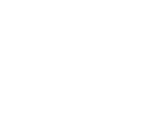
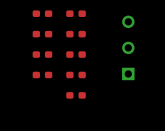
part: none -> (42, 13)
part: none -> (76, 13)
part: none -> (42, 34)
part: none -> (76, 34)
part: none -> (128, 47)
part: none -> (42, 54)
part: none -> (76, 54)
part: none -> (42, 74)
part: none -> (76, 74)
part: none -> (76, 95)

